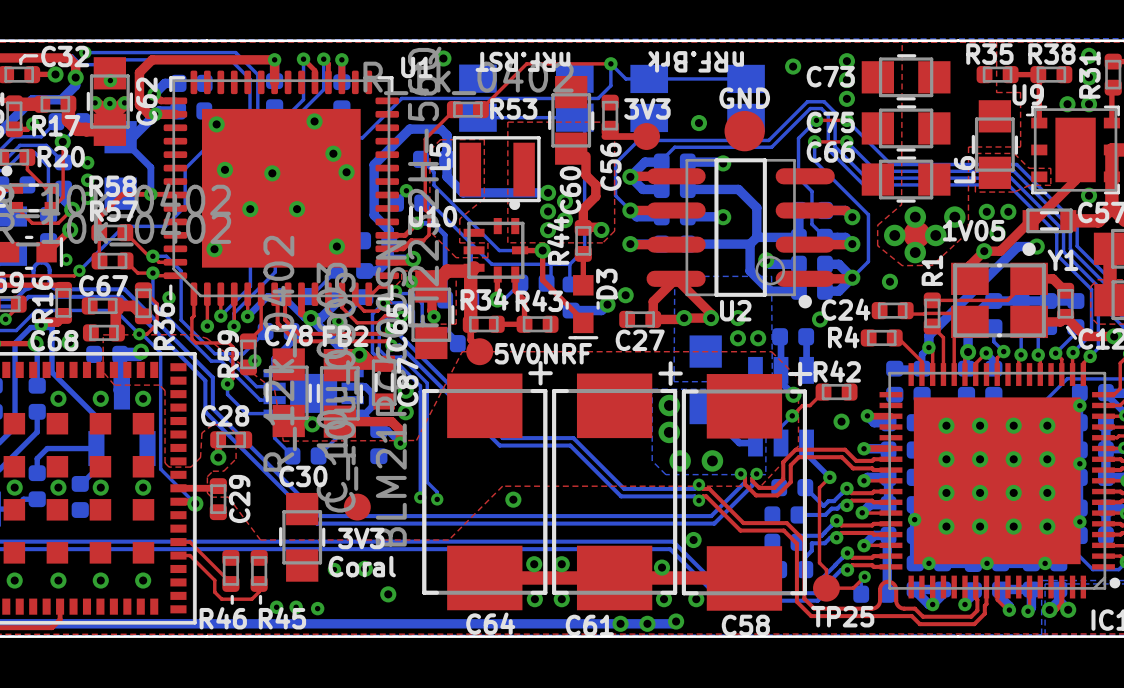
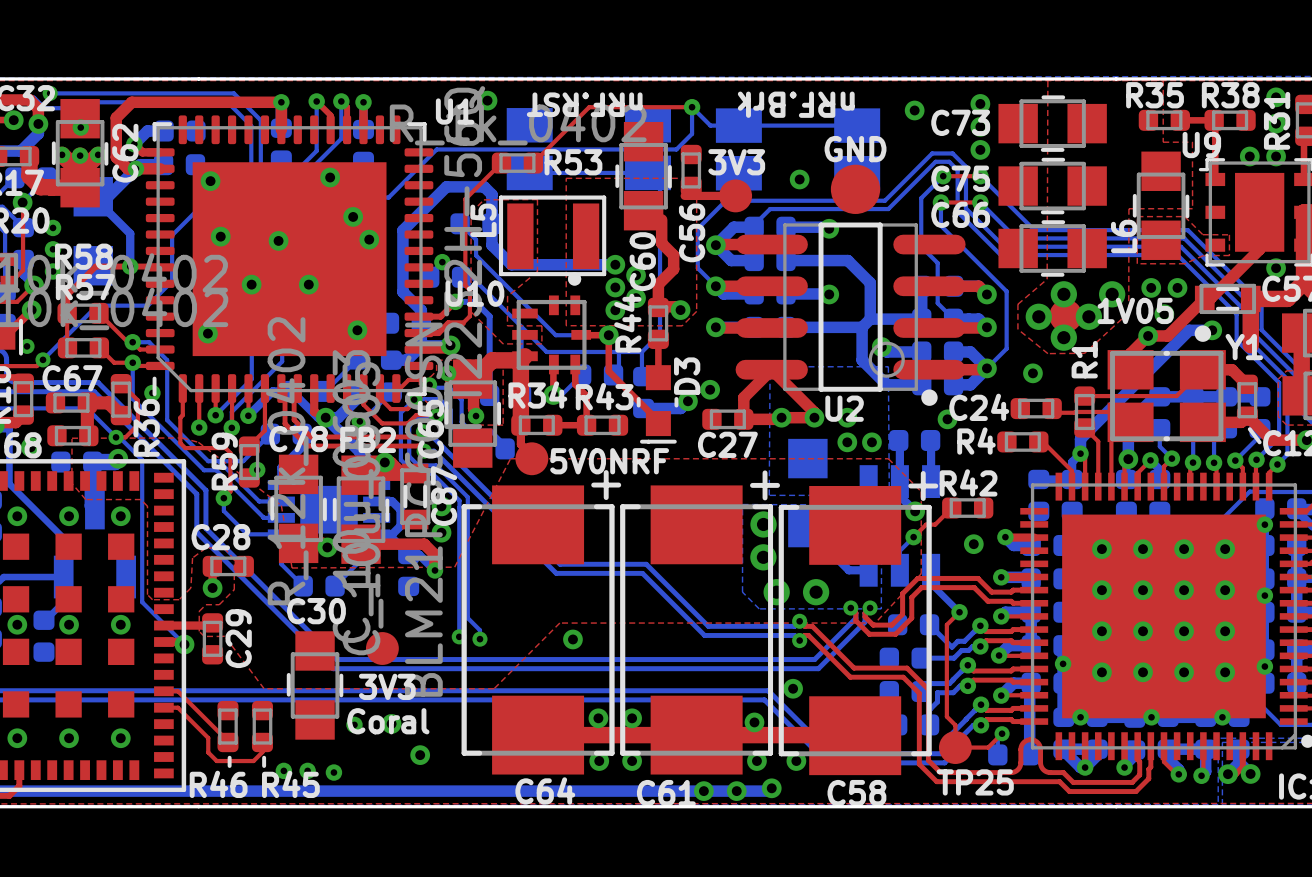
top track: none -> (1250, 298) (1250, 345)

